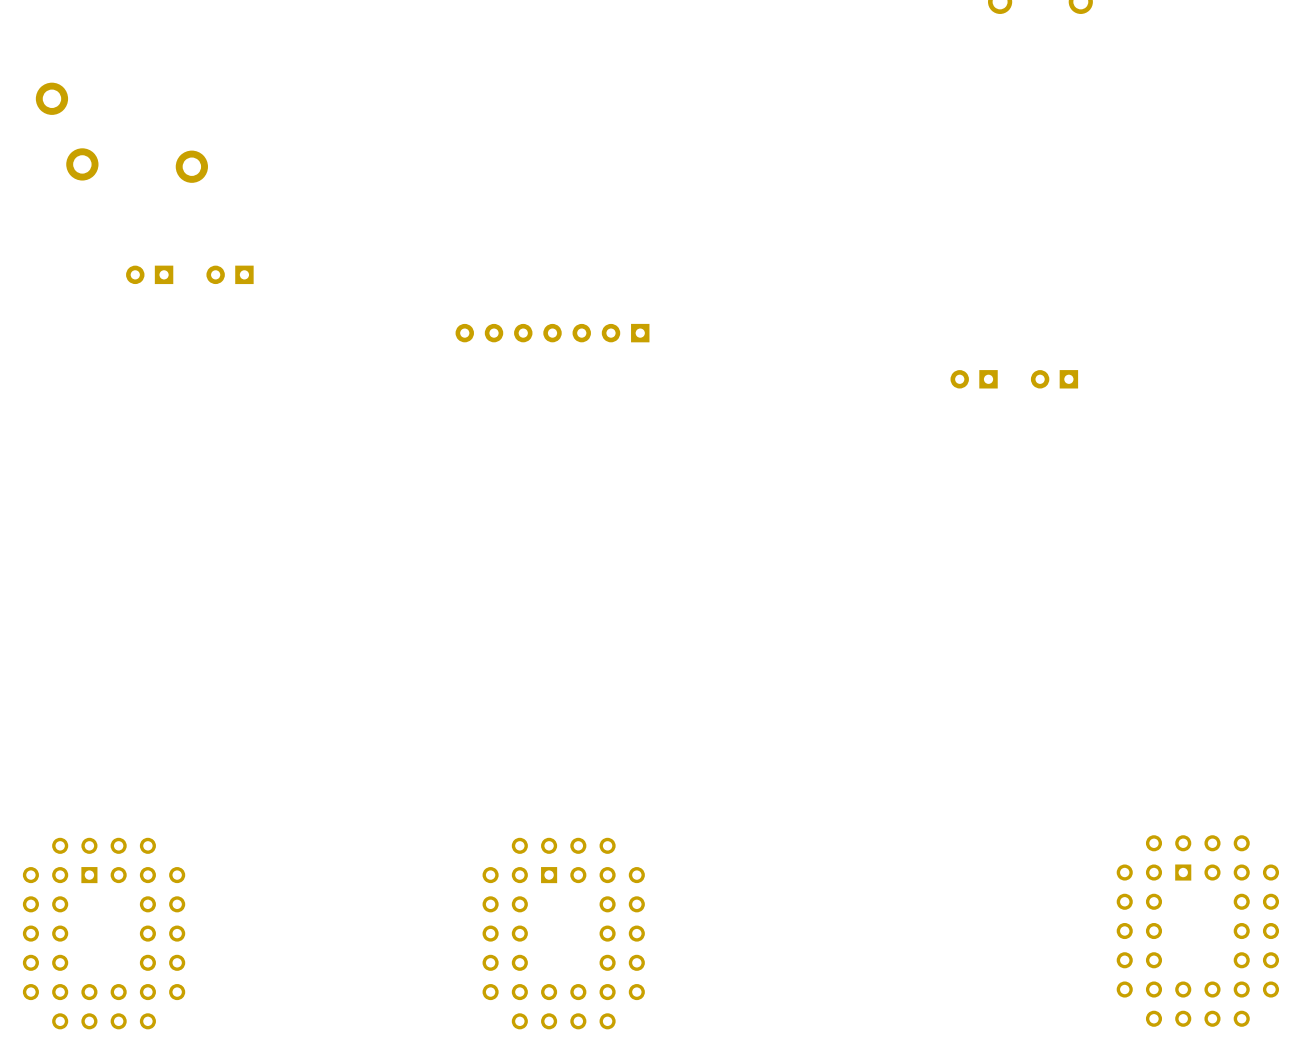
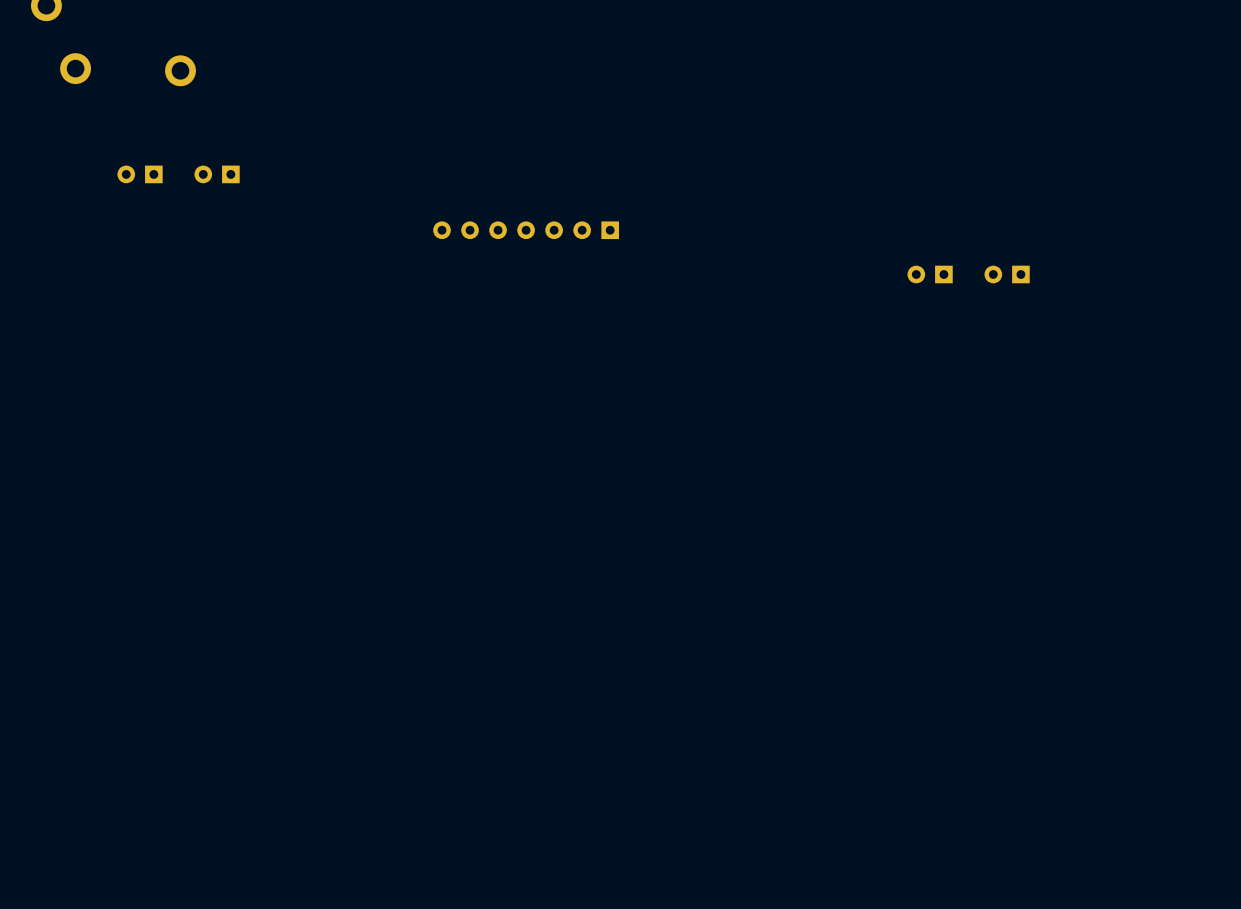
part: (1197, 931) -> none
part: (104, 933) -> none
part: (563, 933) -> none

